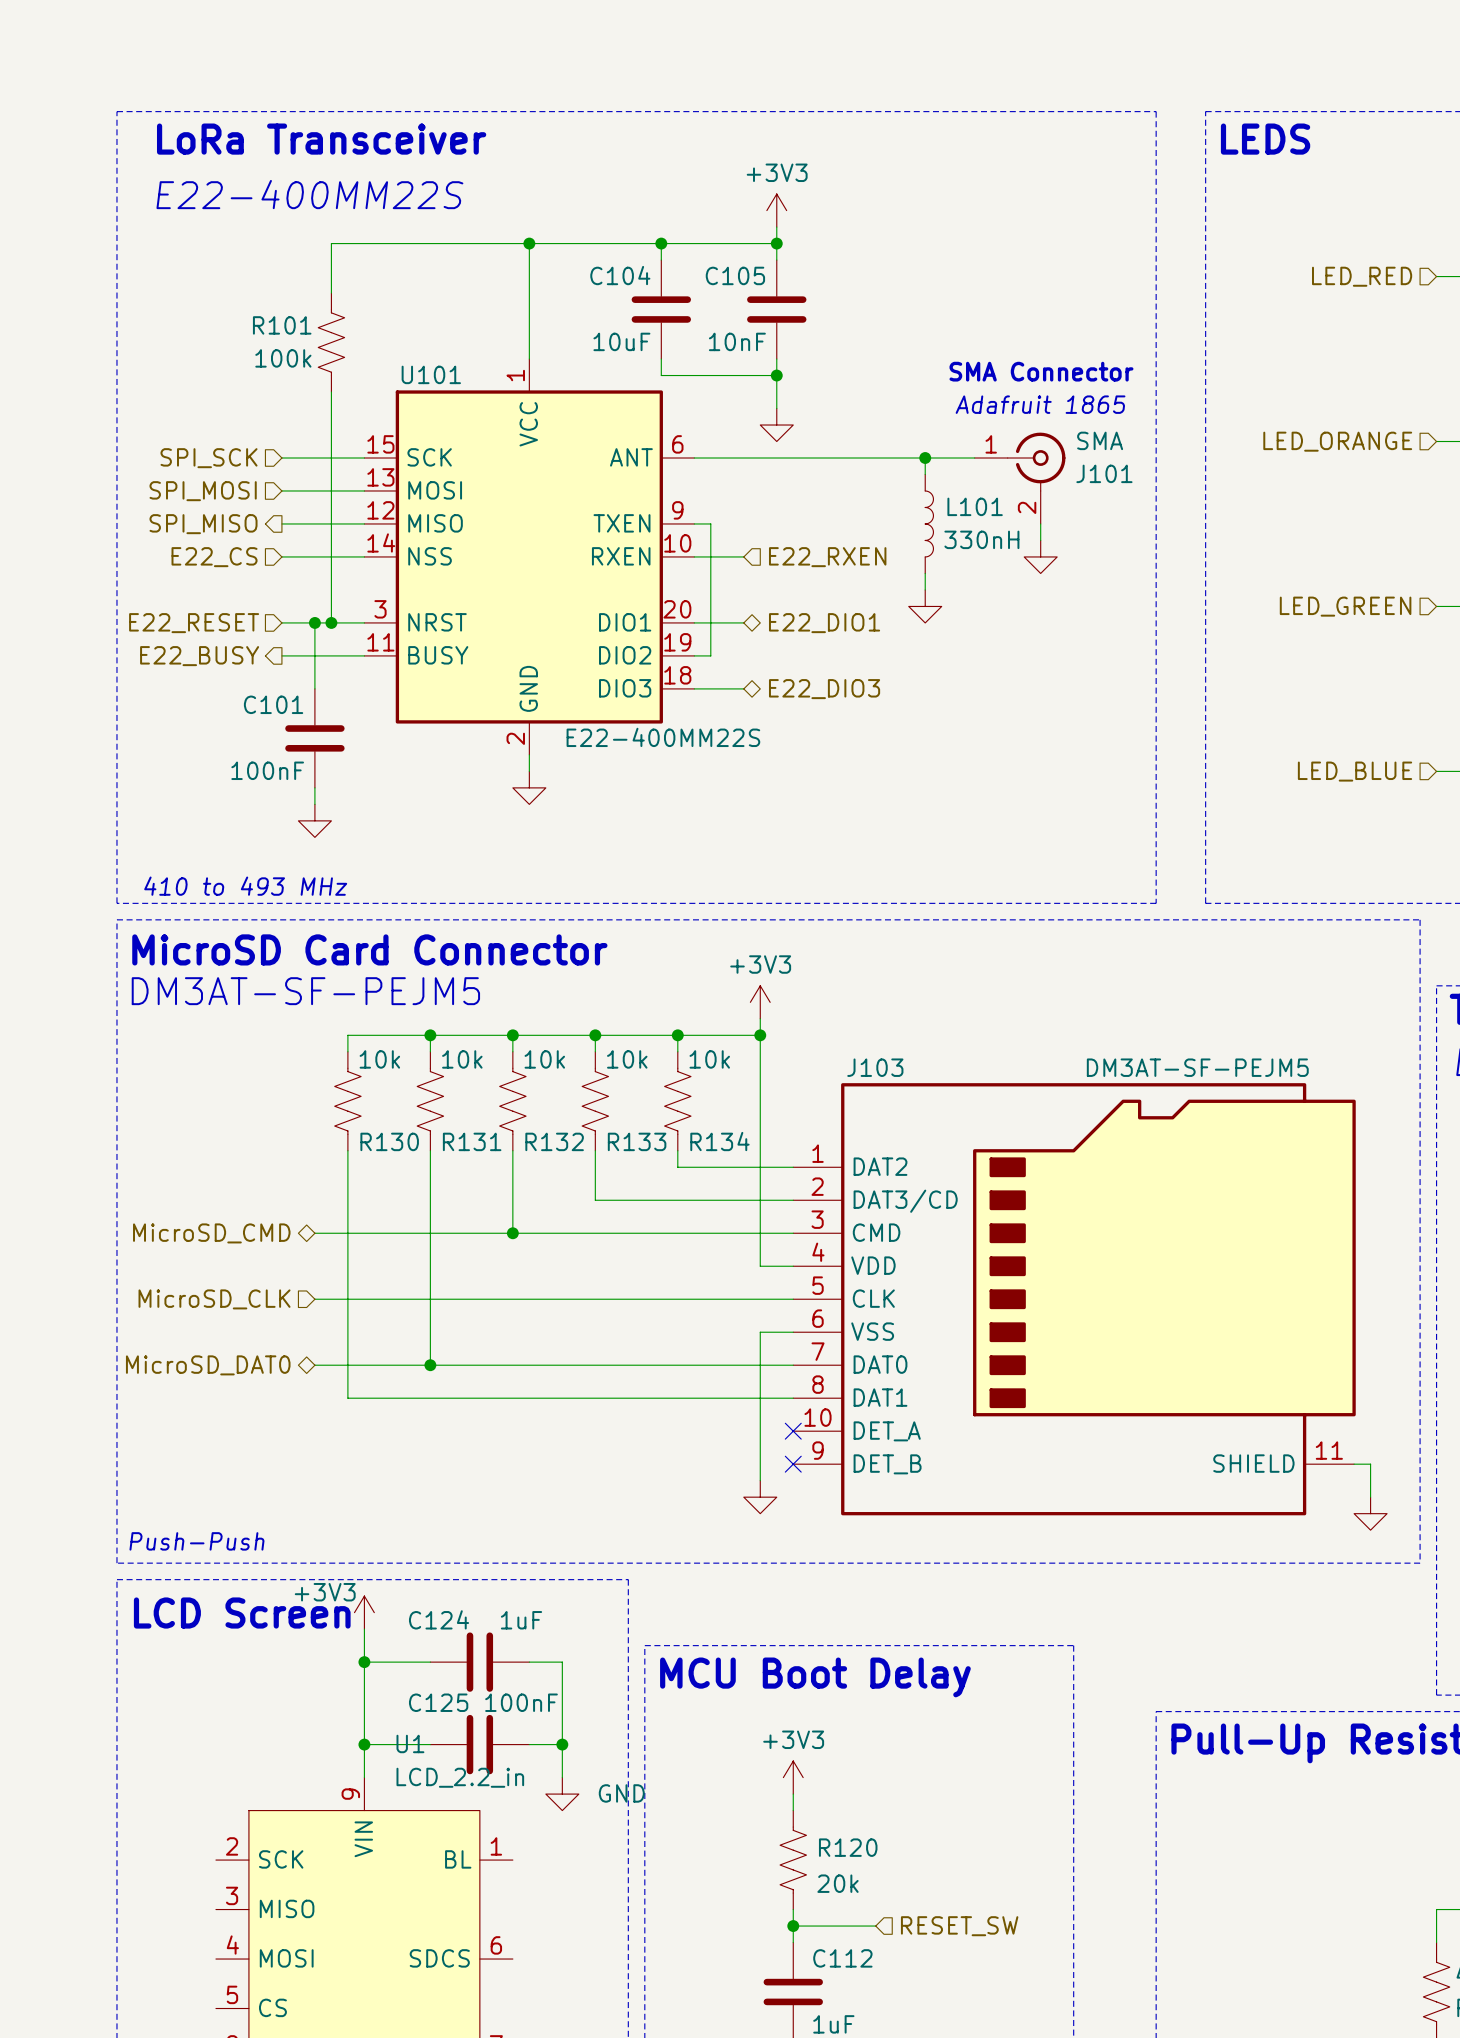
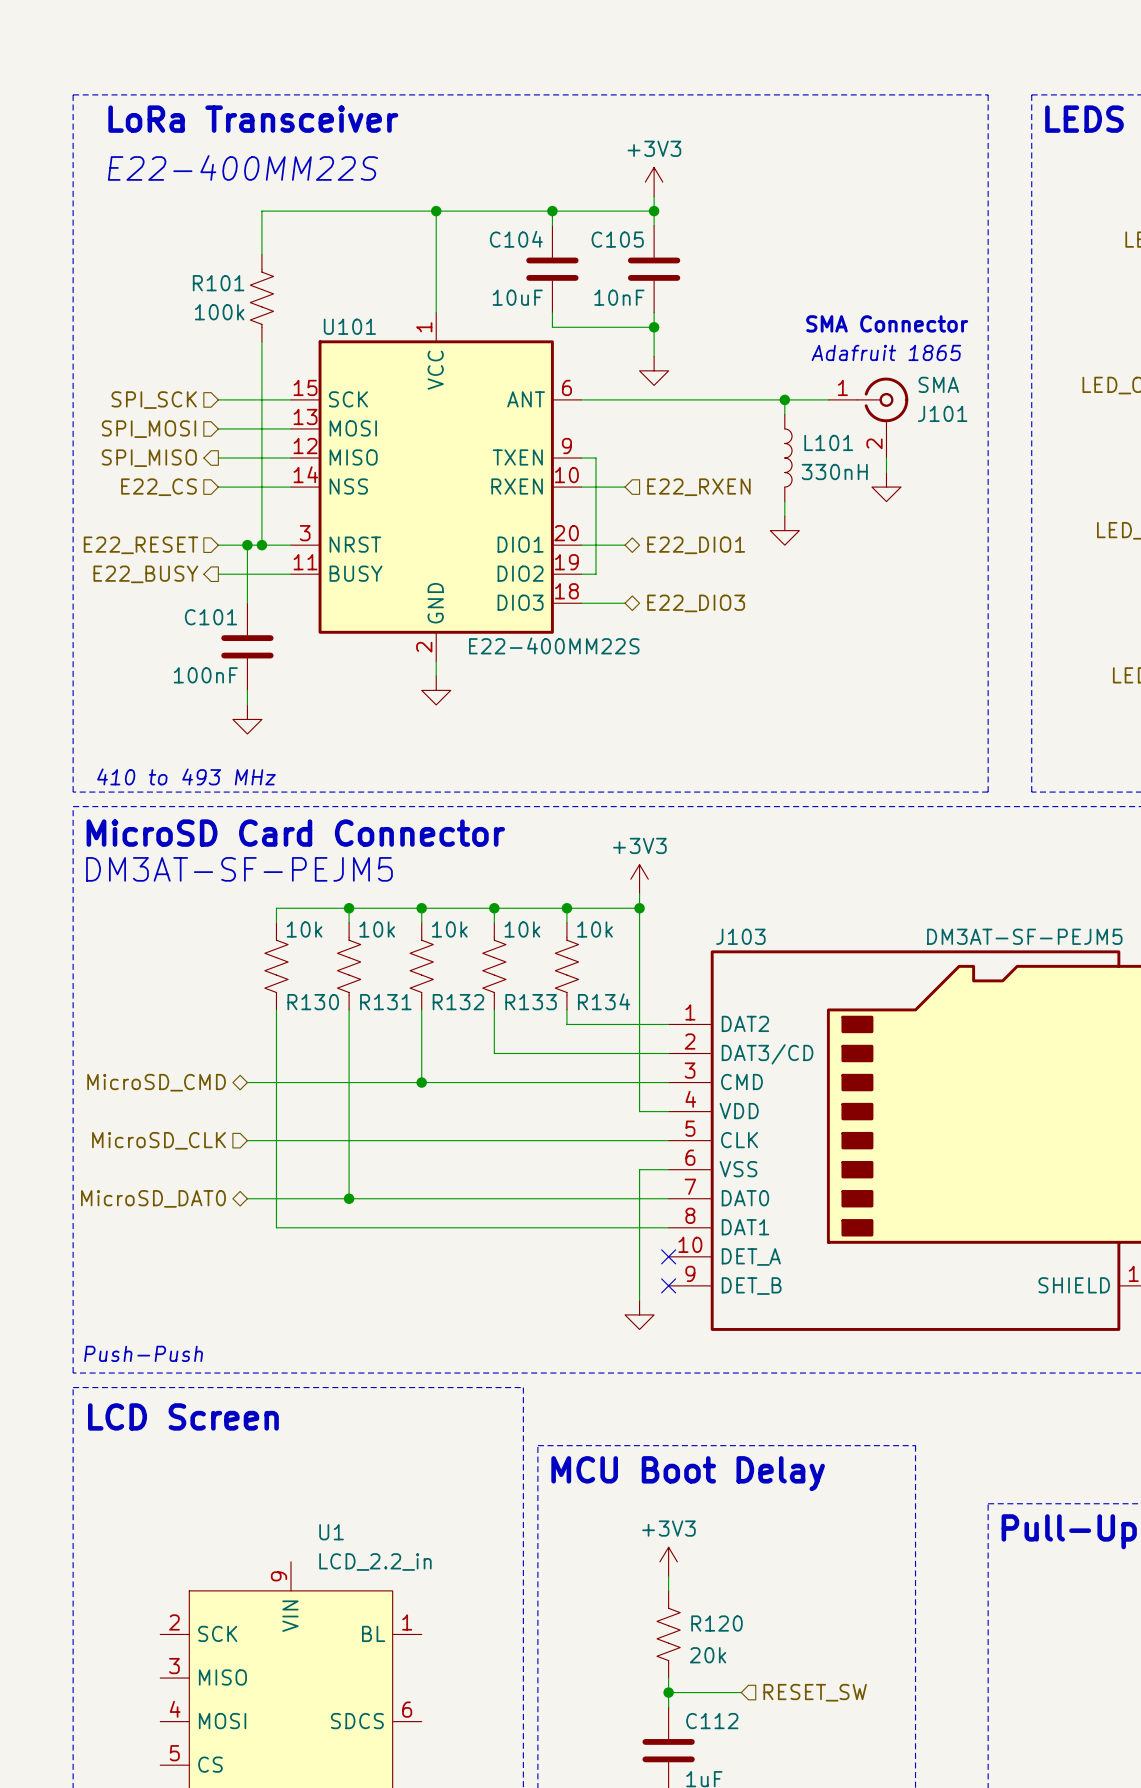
power symbol: +3V3 (364, 1612) -> none
wire: (364, 1629) (364, 1777) -> none
wire: (364, 1662) (430, 1662) -> none
junction: (364, 1662) -> none
C124: 1uF (479, 1662) -> none
wire: (529, 1662) (562, 1662) (562, 1777) -> none
wire: (364, 1744) (430, 1744) -> none
junction: (364, 1744) -> none
C125: 100nF (479, 1744) -> none
wire: (529, 1744) (562, 1744) -> none
junction: (562, 1744) -> none
power symbol: GND (562, 1794) -> none

